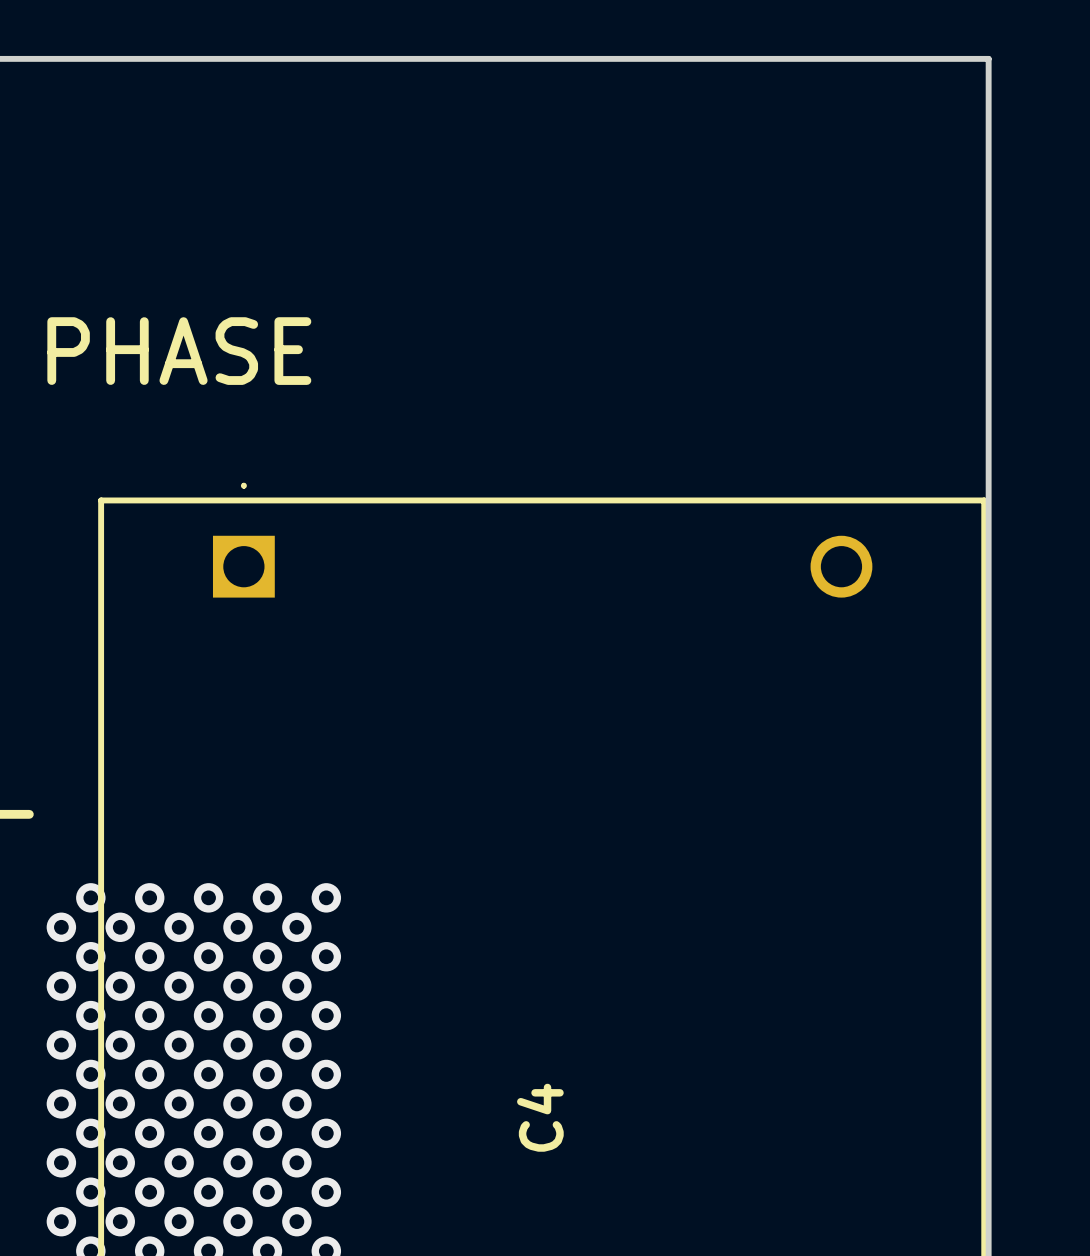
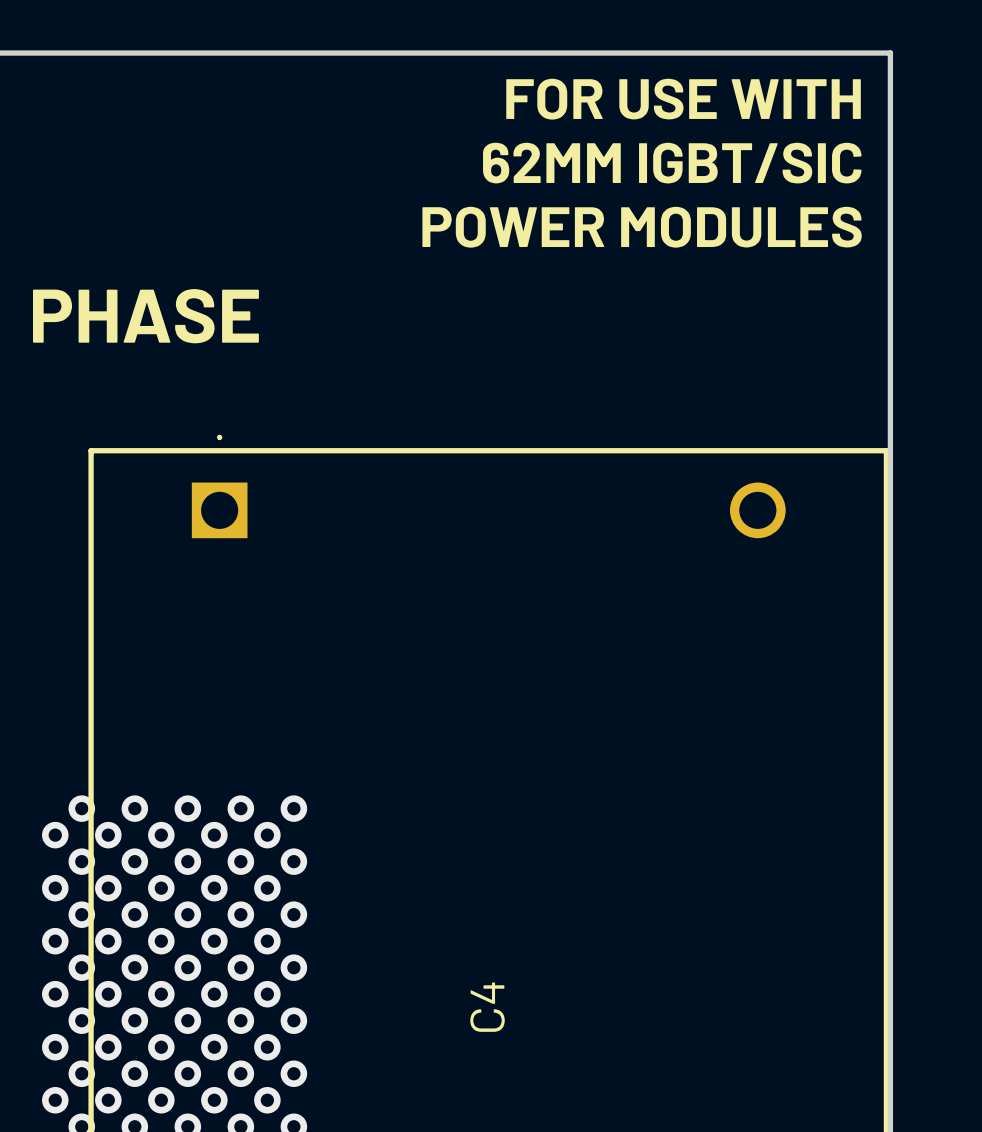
text: none -> FOR USE WITH (683, 99)
text: none -> 62MM IGBT/SIC (672, 163)
text: none -> POWER MODULES (642, 227)

